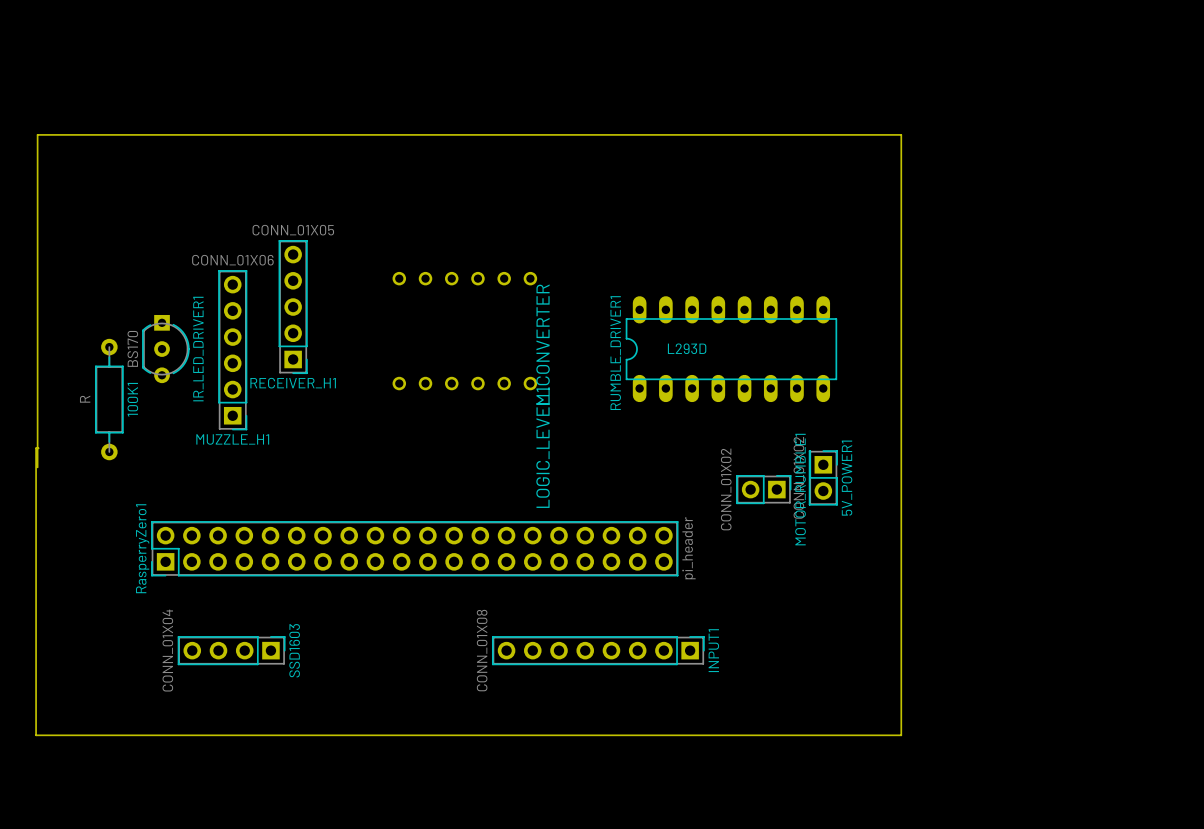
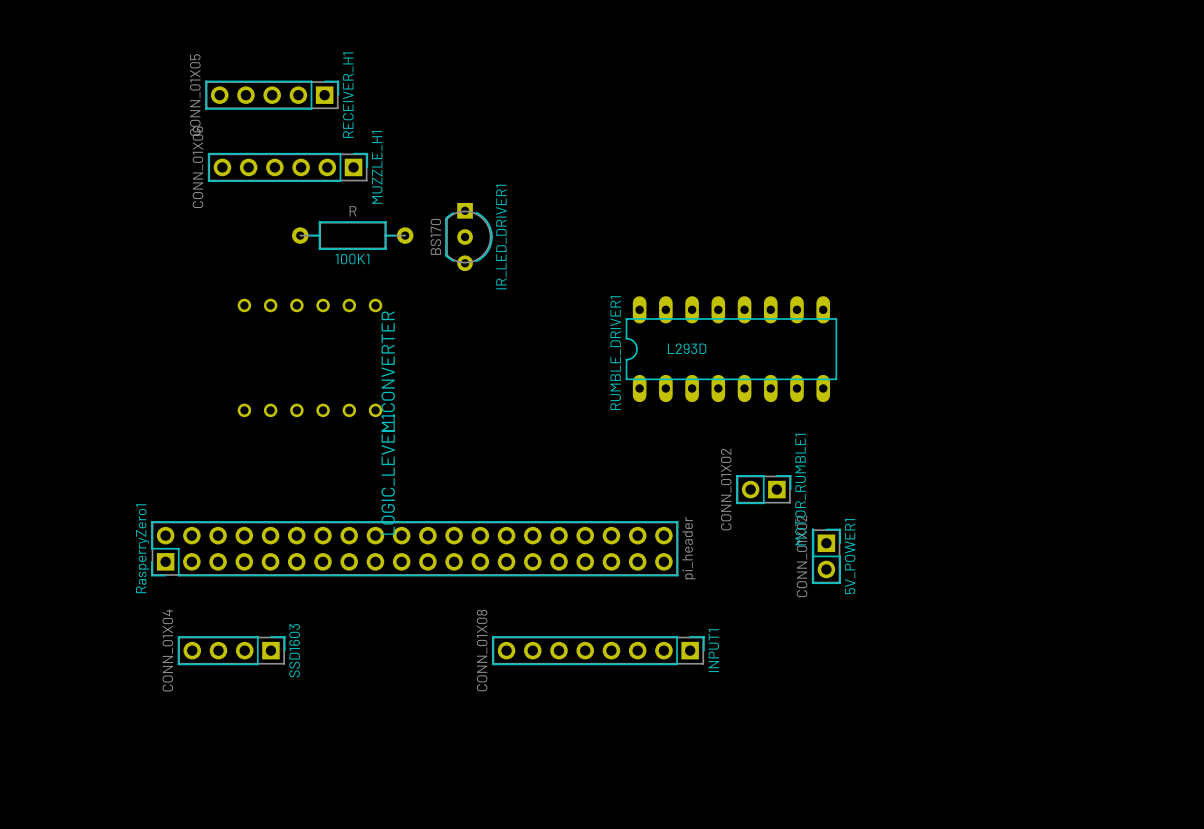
RECEIVER_H1 rotation: 0° (293, 307) -> 90° counterclockwise (272, 95)
RECEIVER_H1 position: (293, 307) -> (272, 95)
M1 position: (464, 331) -> (309, 357)
IR_LED_DRIVER1 position: (165, 349) -> (468, 237)
MUZZLE_H1 rotation: 0° (232, 350) -> 90° counterclockwise (287, 167)
MUZZLE_H1 position: (232, 350) -> (287, 167)
100K1 rotation: 0° (109, 399) -> 90° clockwise (352, 235)
100K1 position: (109, 399) -> (352, 235)
board edge: (38, 448) (36, 448) (36, 735) (901, 735) (901, 134) (37, 134) (37, 467) -> none
5V_POWER1 position: (823, 477) -> (826, 556)

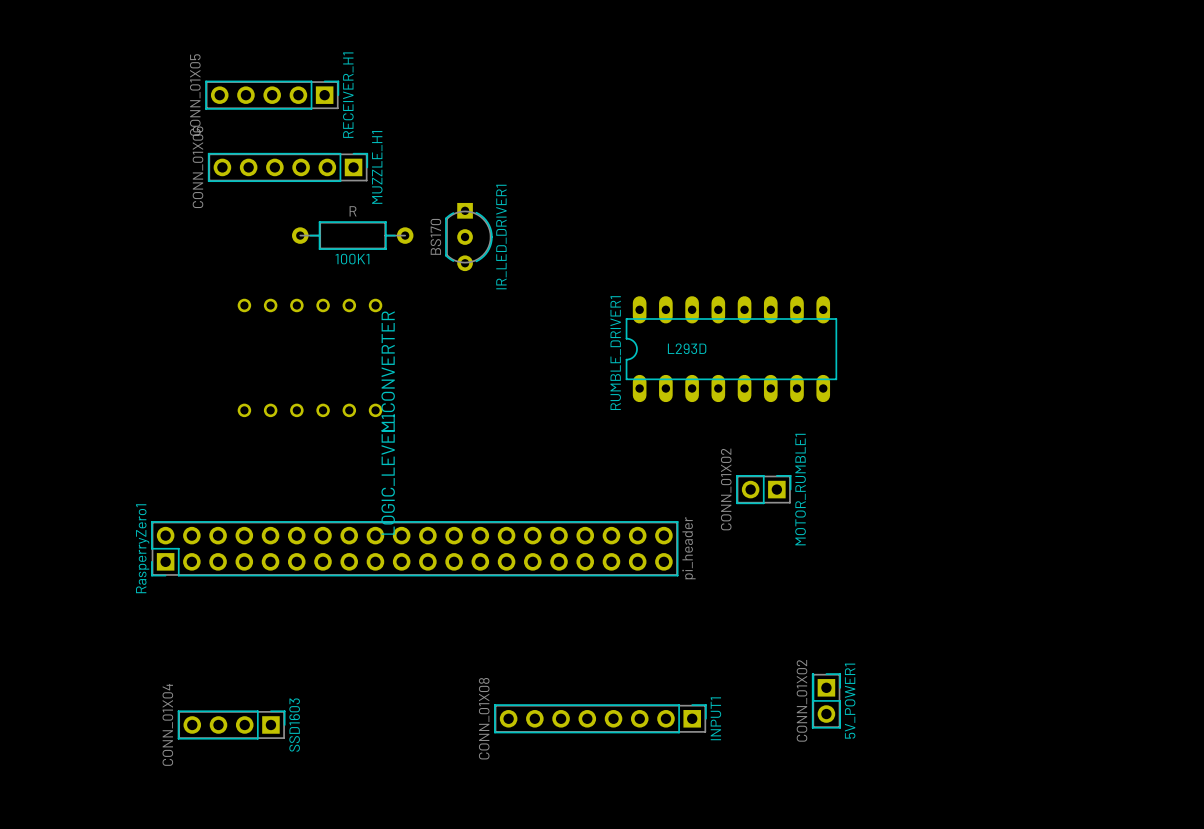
5V_POWER1 position: (826, 556) -> (826, 700)
SSD1603 position: (231, 650) -> (231, 724)
INPUT1 position: (598, 650) -> (600, 718)

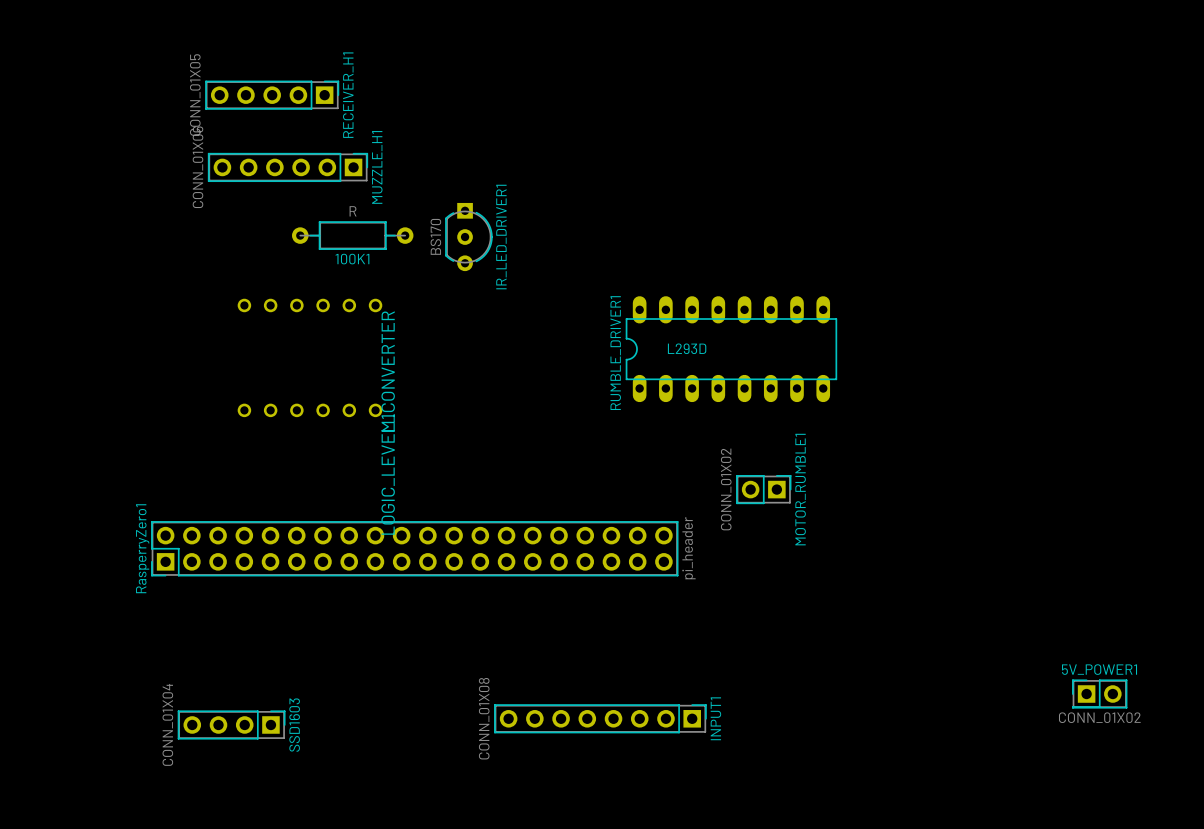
5V_POWER1 rotation: 0° (826, 700) -> 90° counterclockwise (1099, 694)
5V_POWER1 position: (826, 700) -> (1099, 694)

